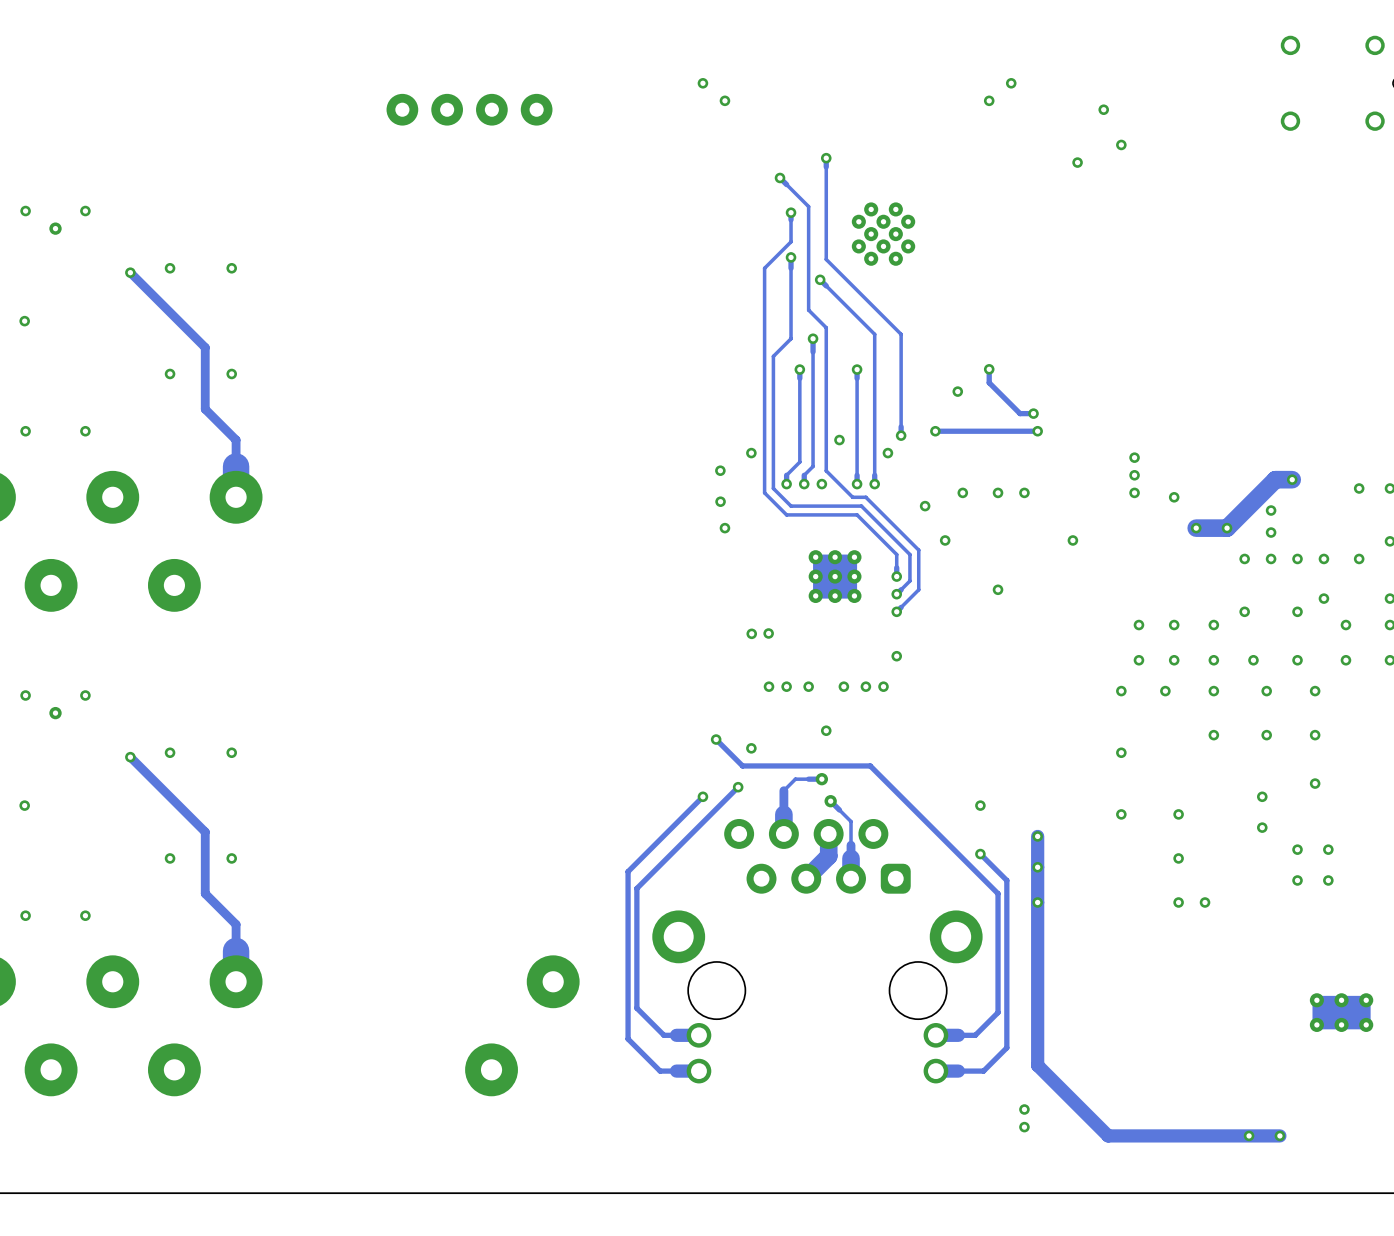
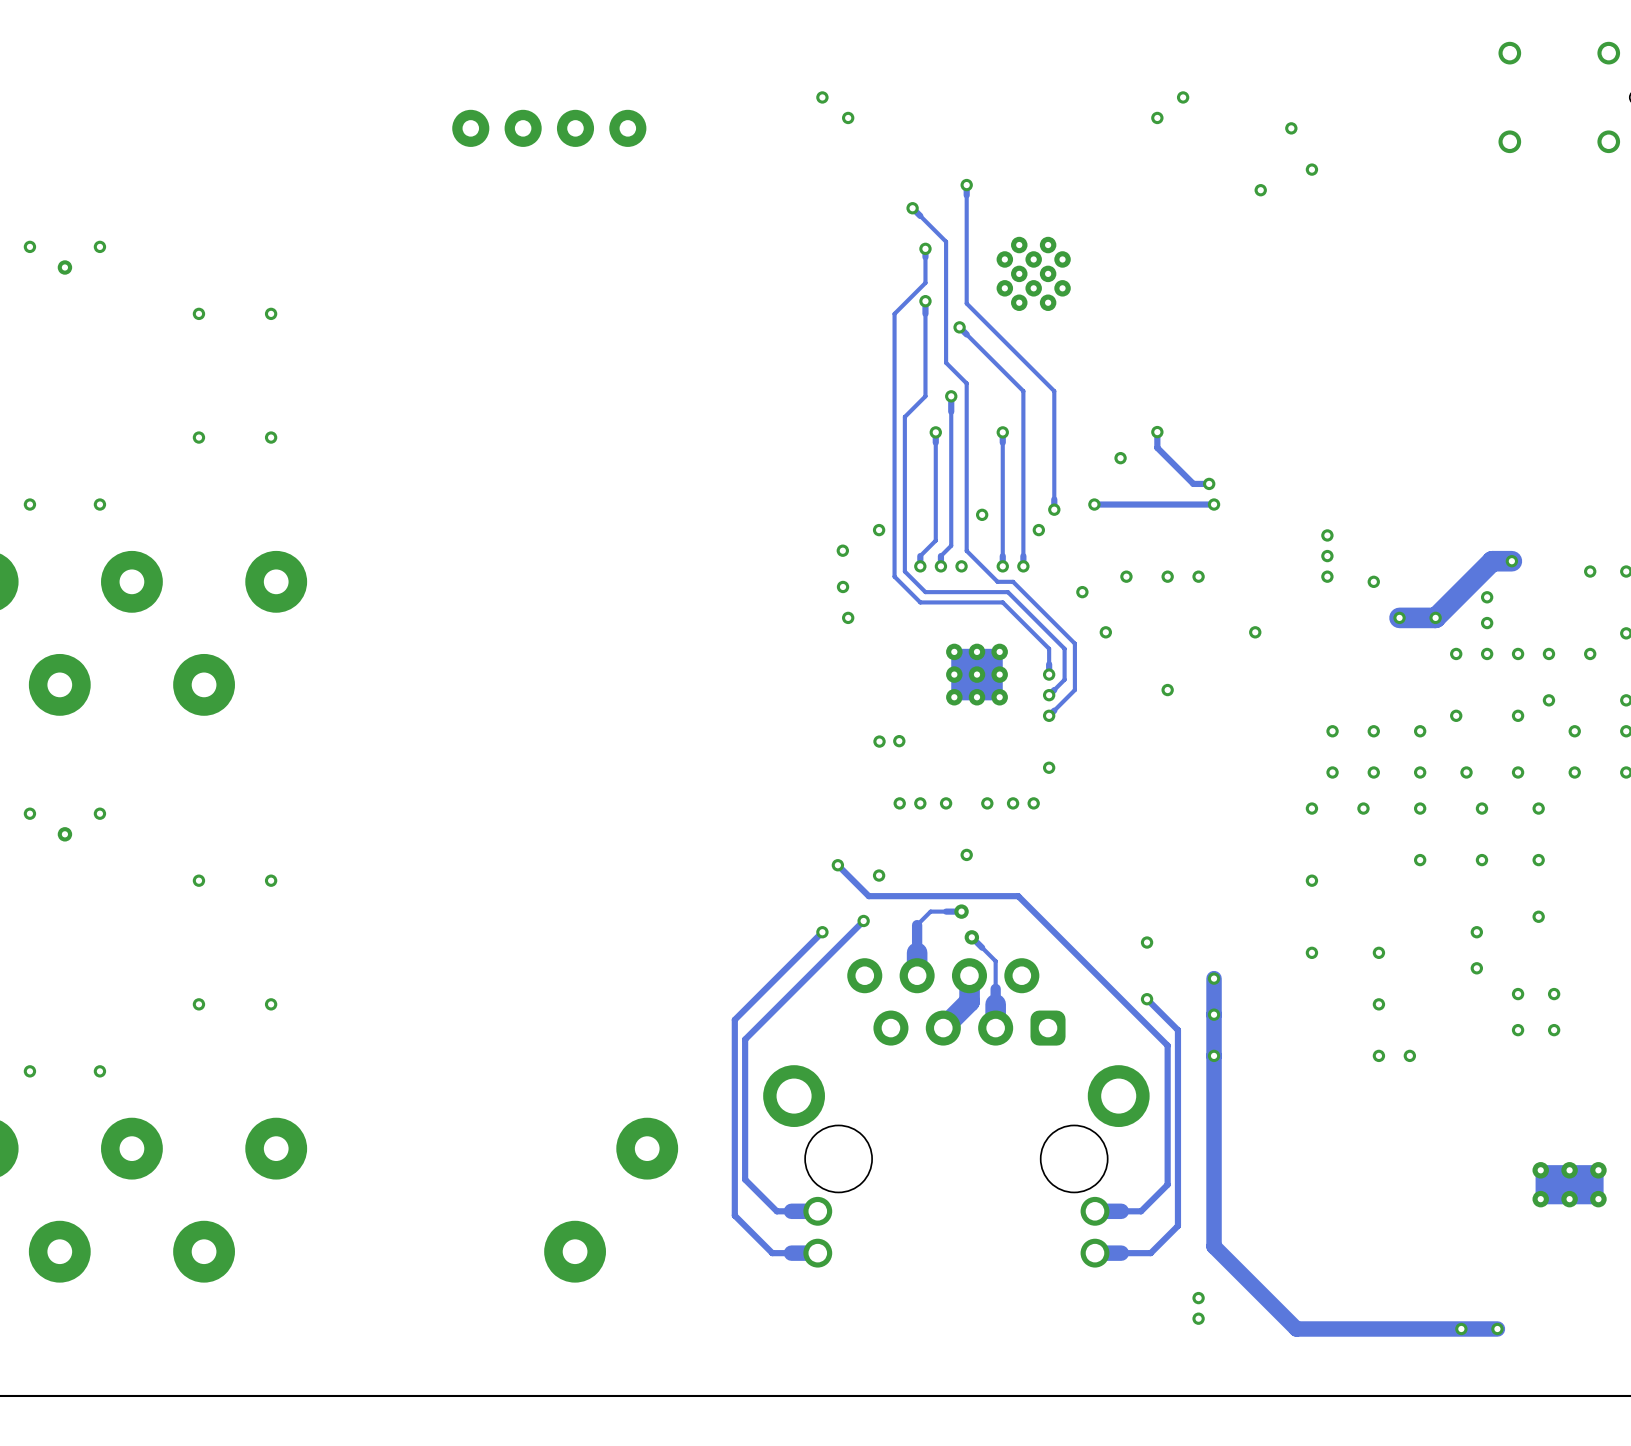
track: (130, 272) (205, 347) (205, 409) (236, 440) (236, 497) -> none
via: (130, 272) -> none
via: (24, 321) -> none
track: (130, 757) (205, 832) (205, 893) (236, 924) (236, 981) -> none
via: (130, 757) -> none
via: (24, 805) -> none

